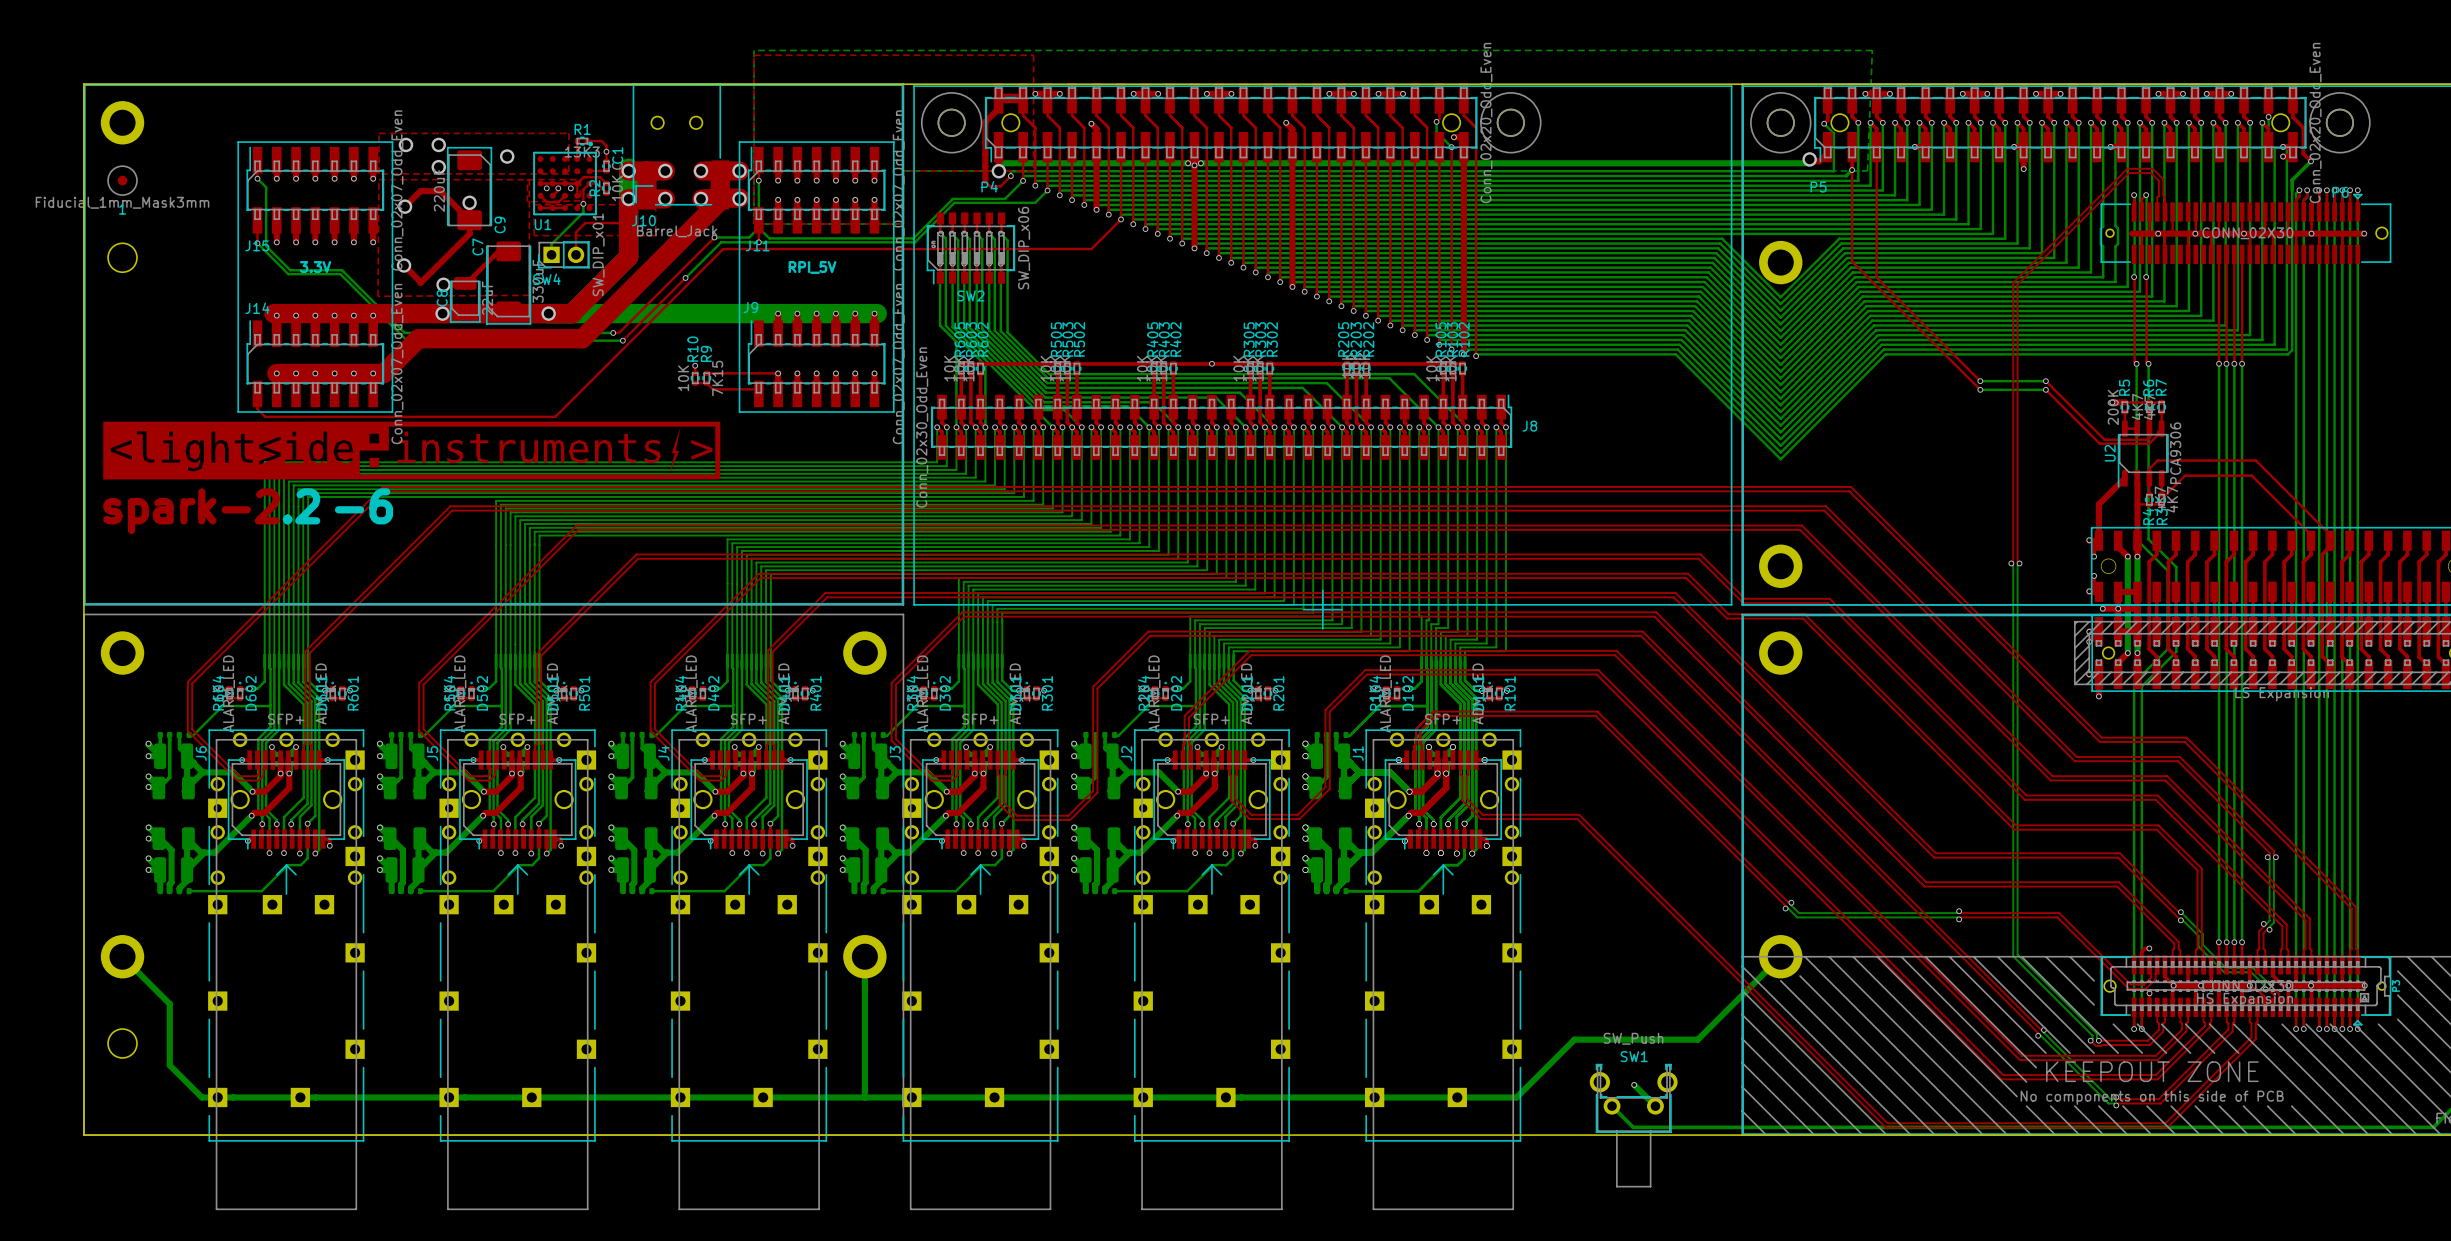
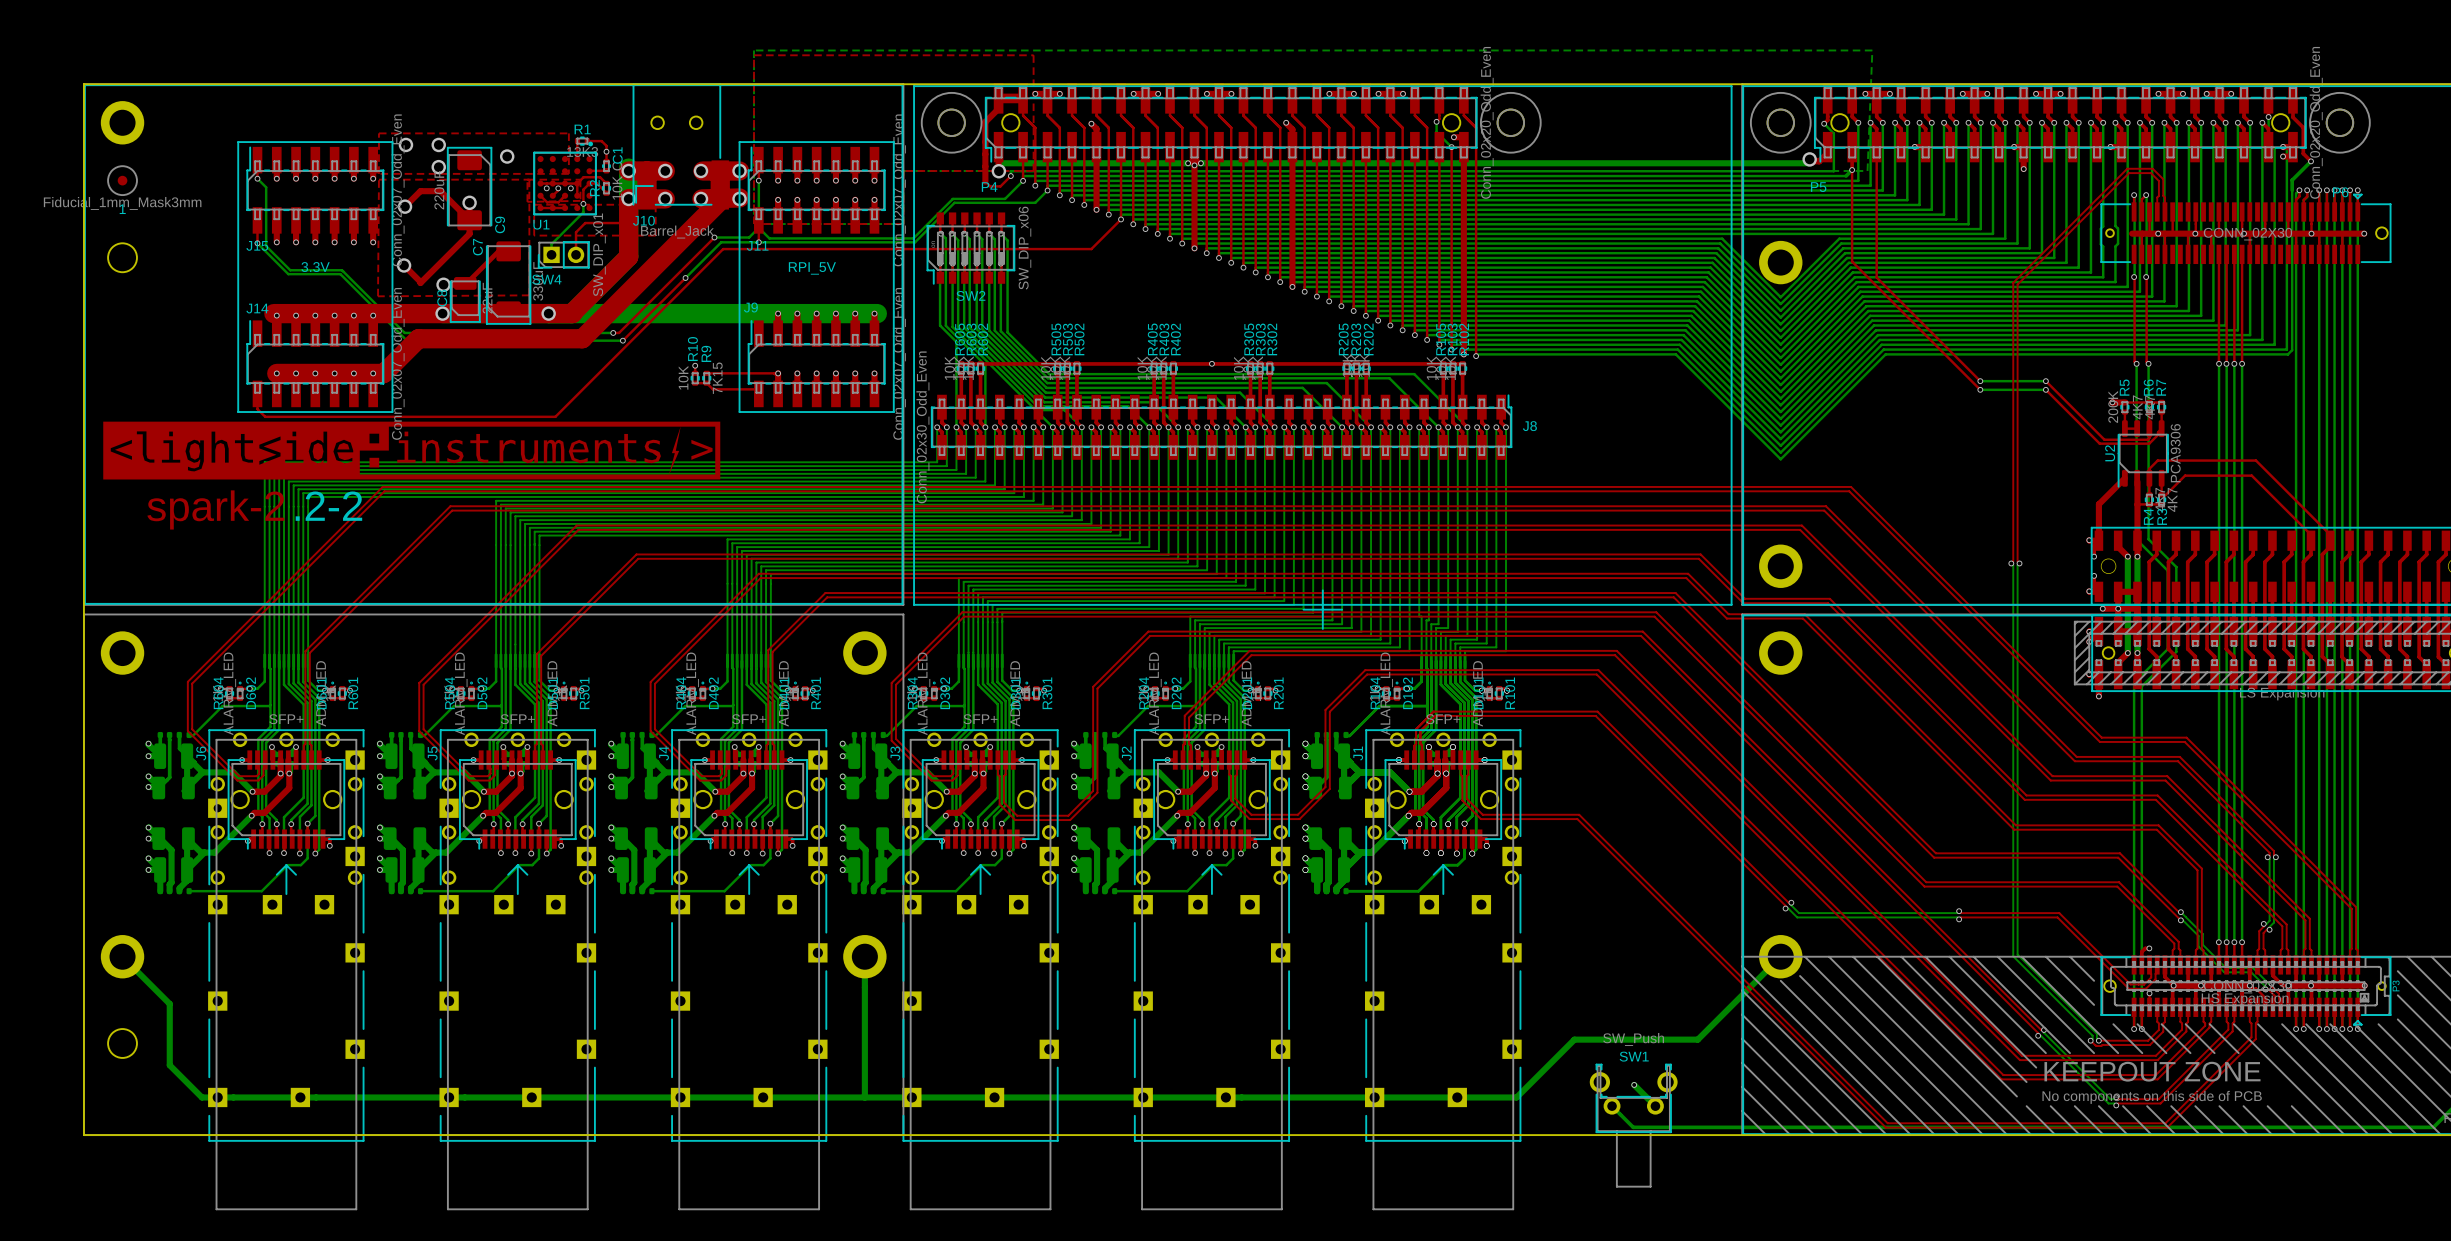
text: -6 (364, 506) -> -2 (345, 506)

